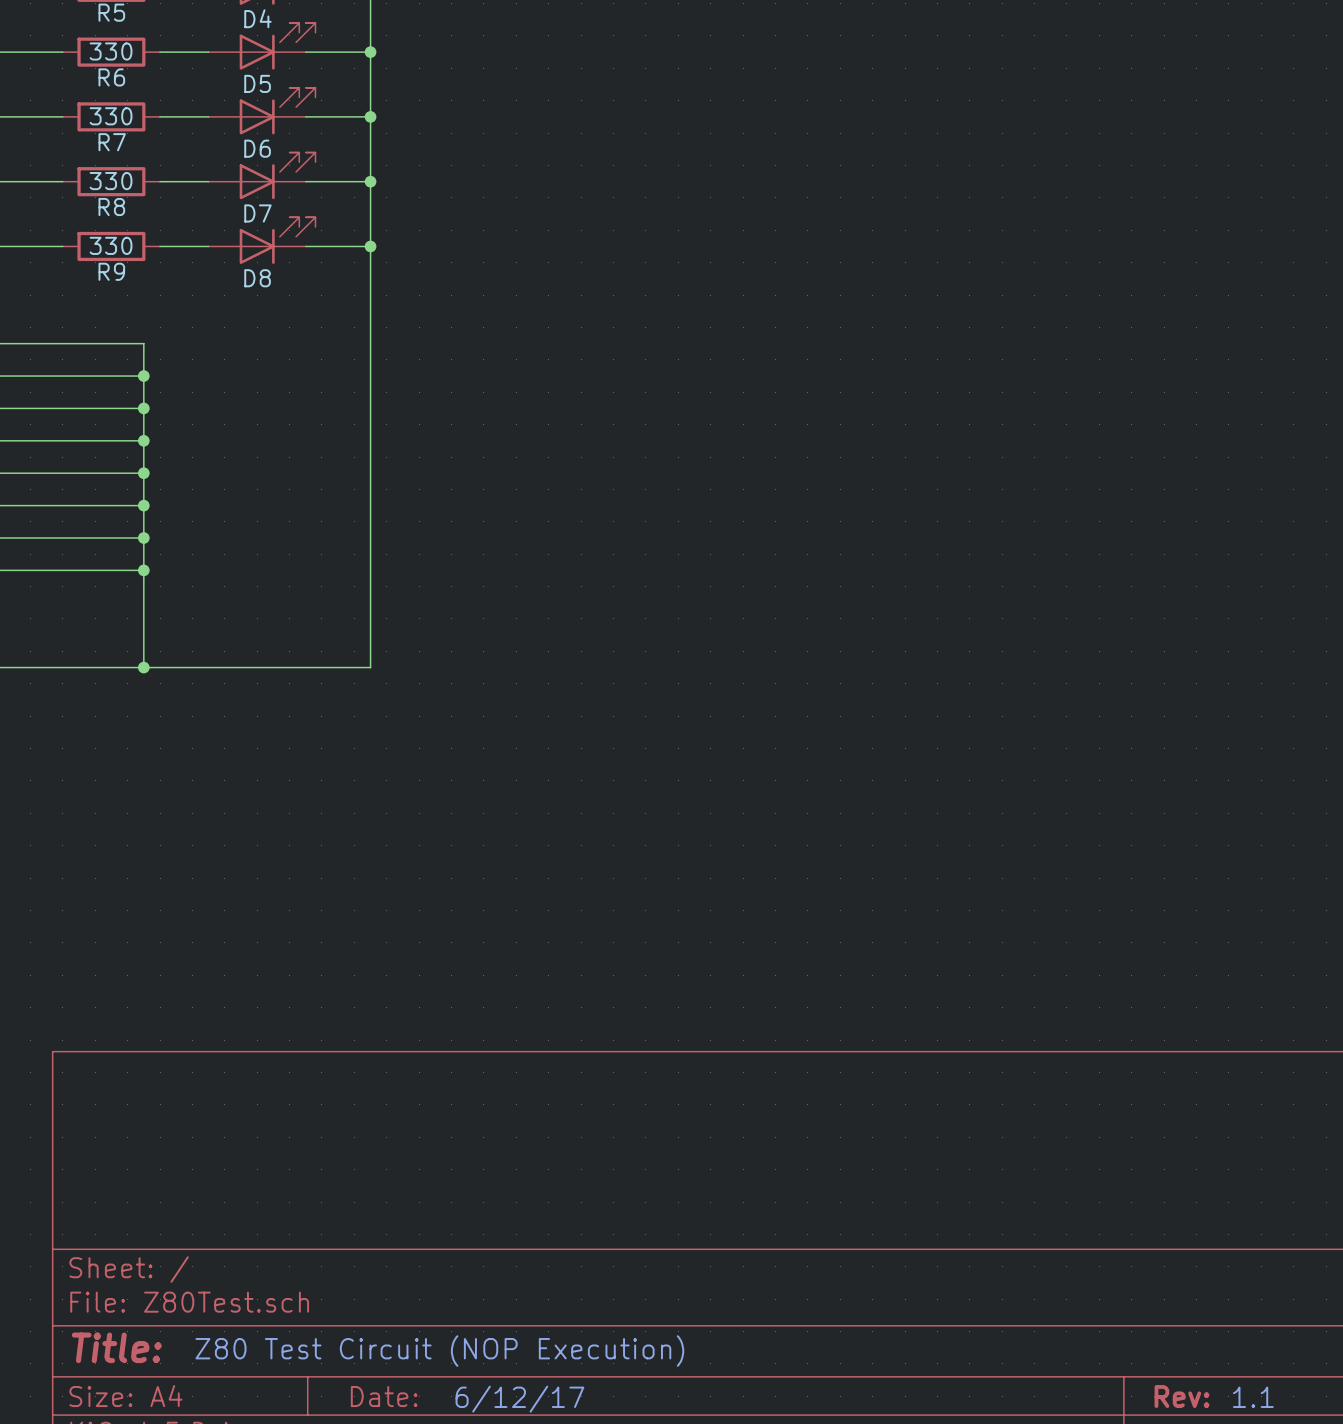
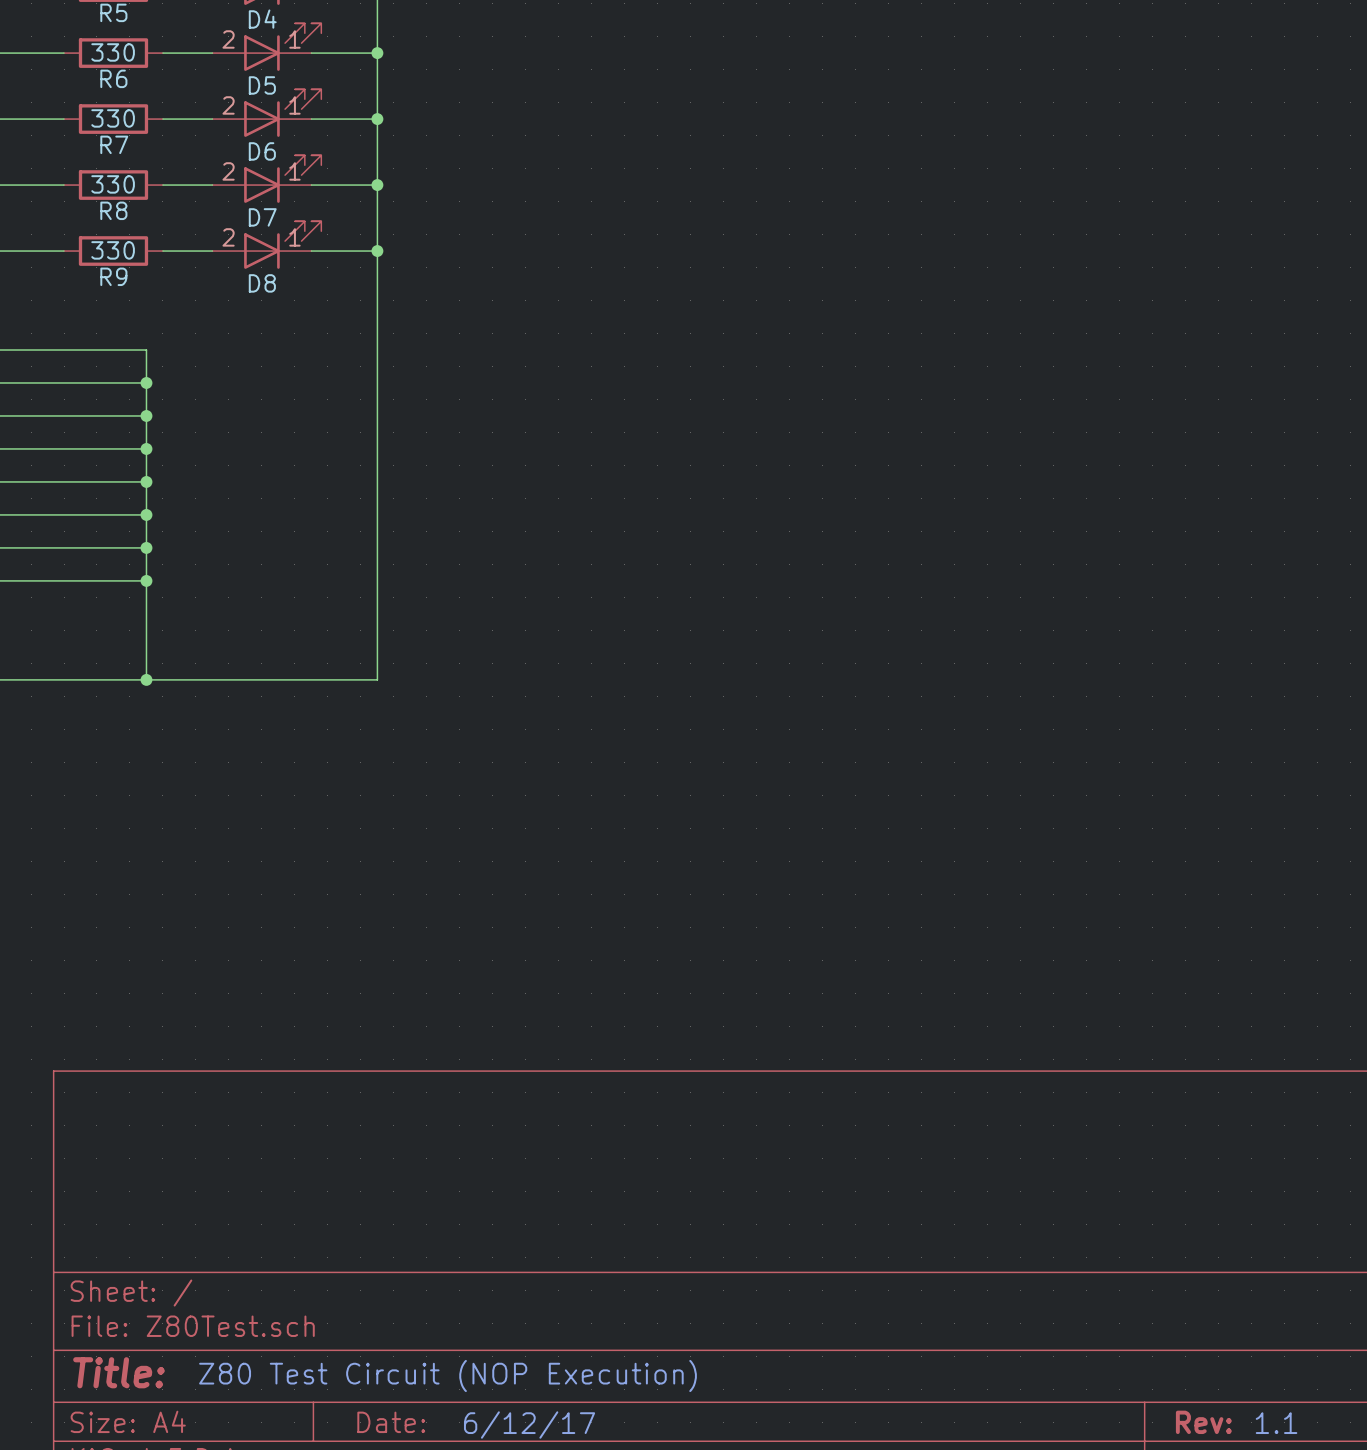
D5 pin number: none -> 2 (228, 39)
D5 pin number: none -> 1 (294, 39)
D6 pin number: none -> 2 (228, 105)
D6 pin number: none -> 1 (294, 105)
D7 pin number: none -> 2 (228, 171)
D7 pin number: none -> 1 (294, 171)
D8 pin number: none -> 2 (228, 237)
D8 pin number: none -> 1 (294, 237)

